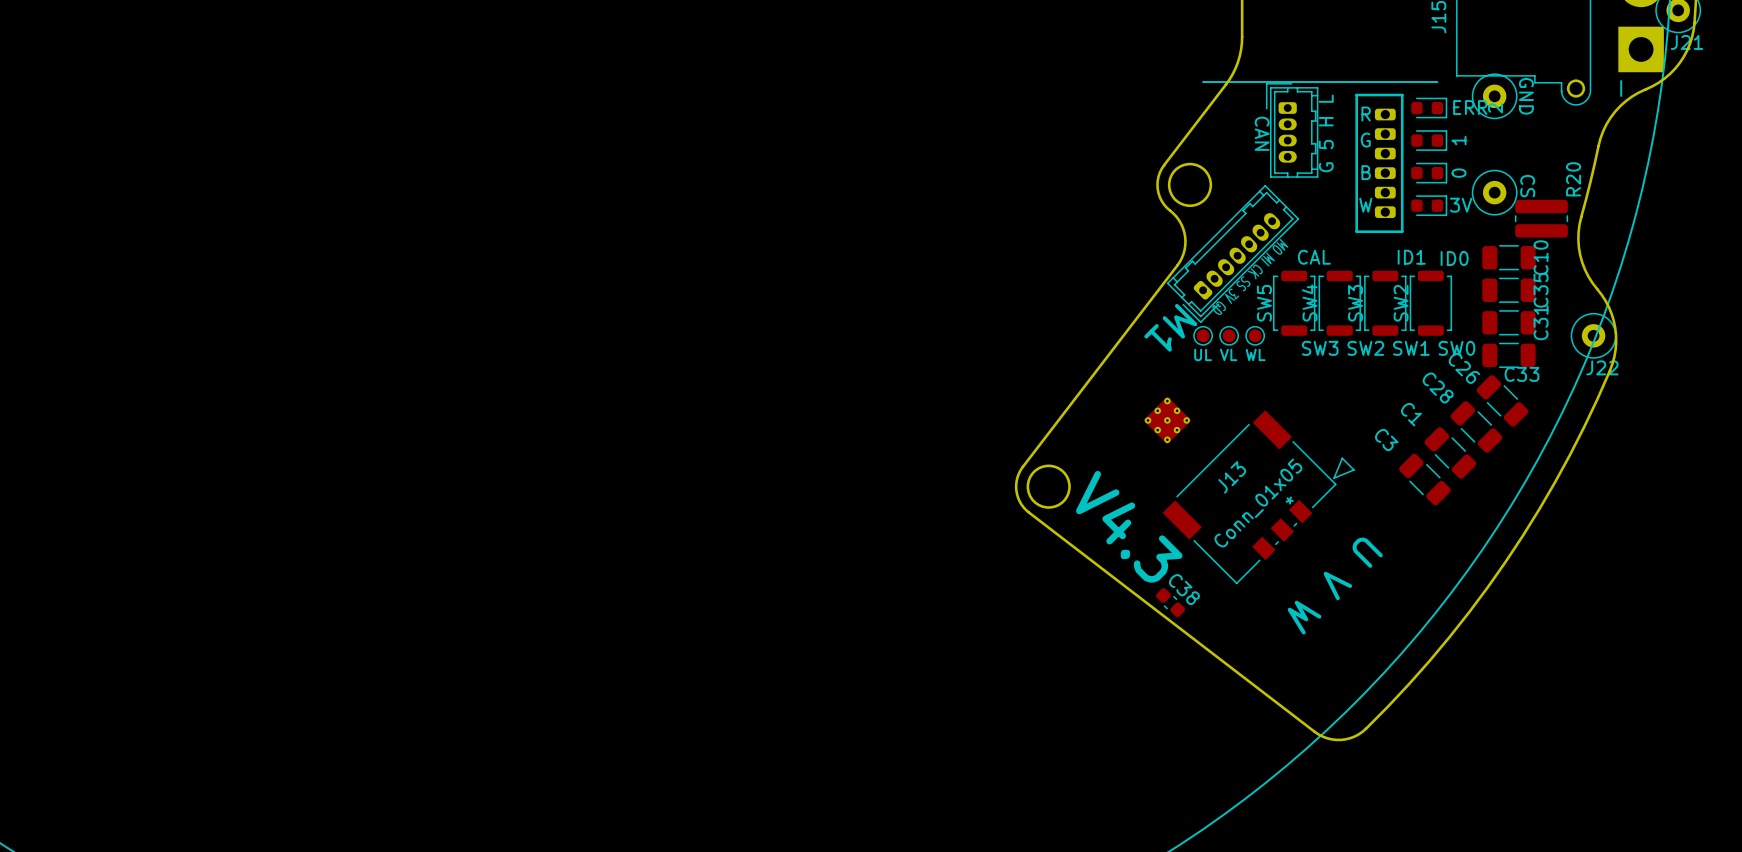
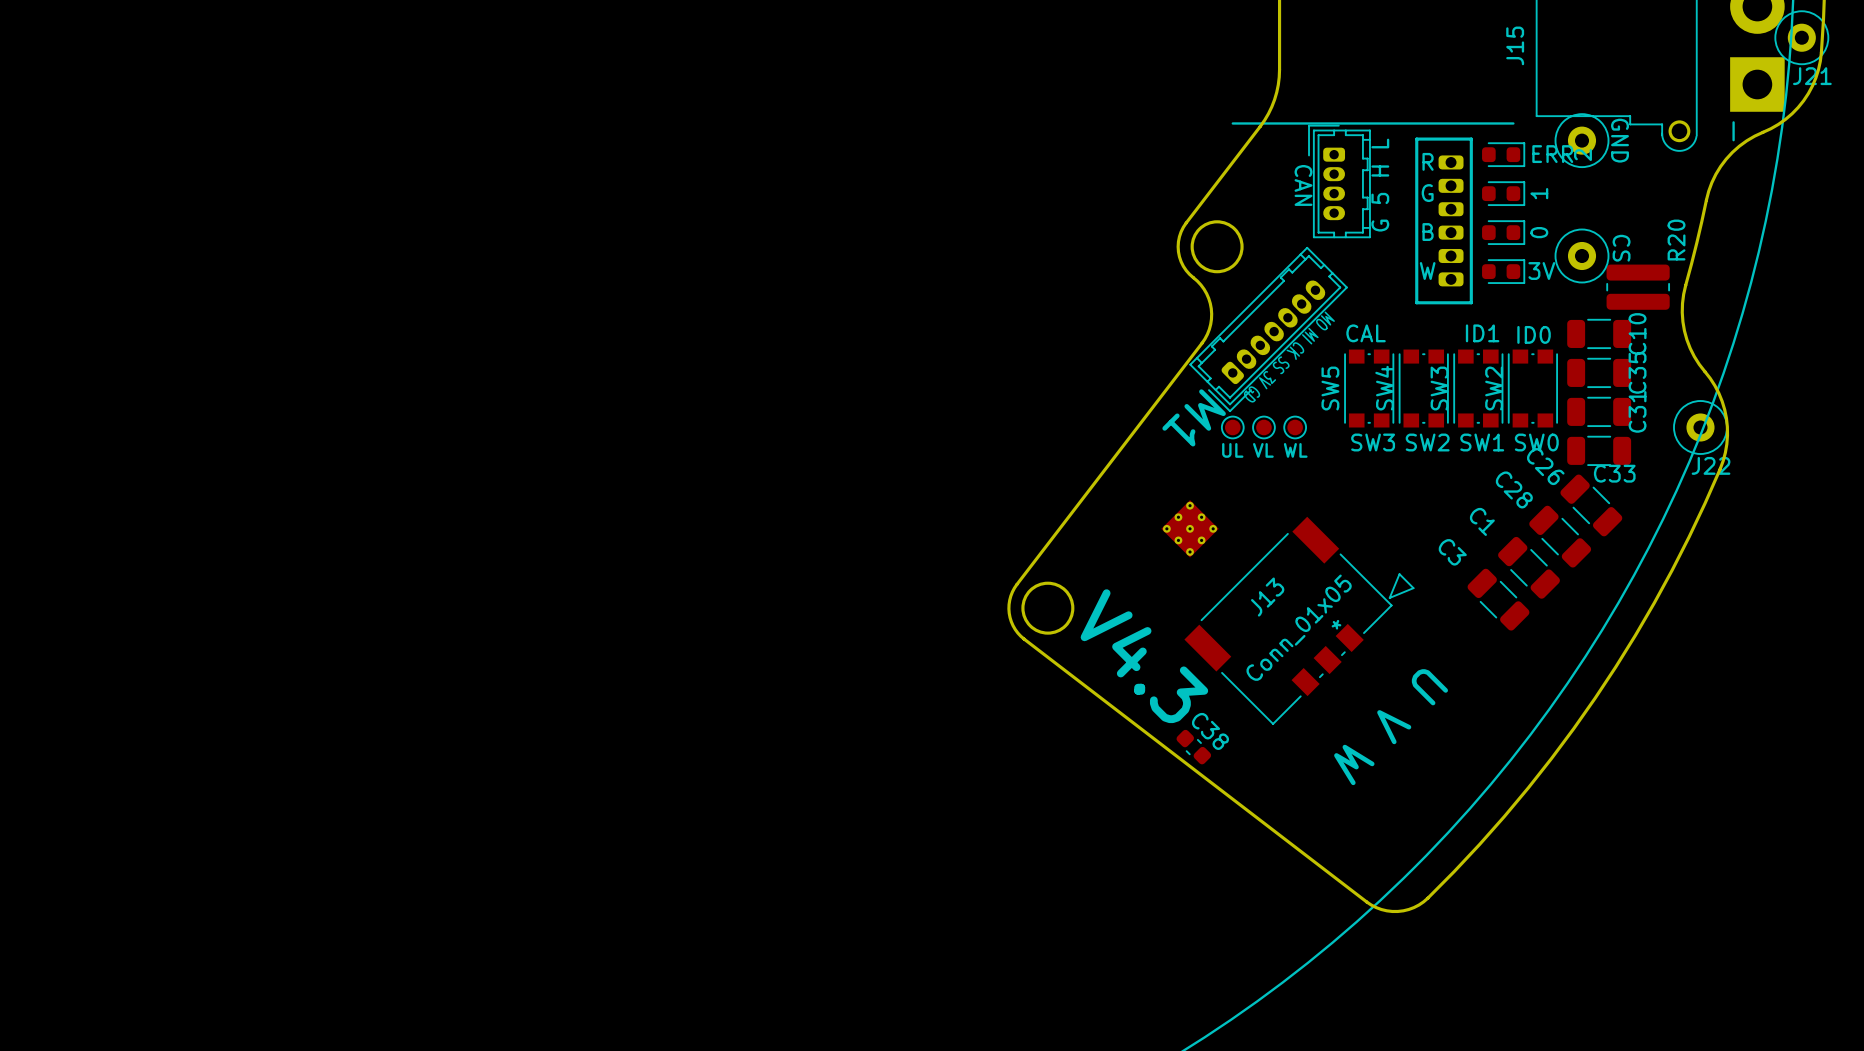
SW5 footprint: [1272, 270, 1316, 336] -> [1344, 349, 1395, 428]
SW4 footprint: [1318, 270, 1361, 336] -> [1398, 349, 1449, 428]
SW3 footprint: [1364, 270, 1407, 336] -> [1453, 349, 1504, 428]
SW2 footprint: [1409, 270, 1453, 336] -> [1507, 349, 1559, 428]

